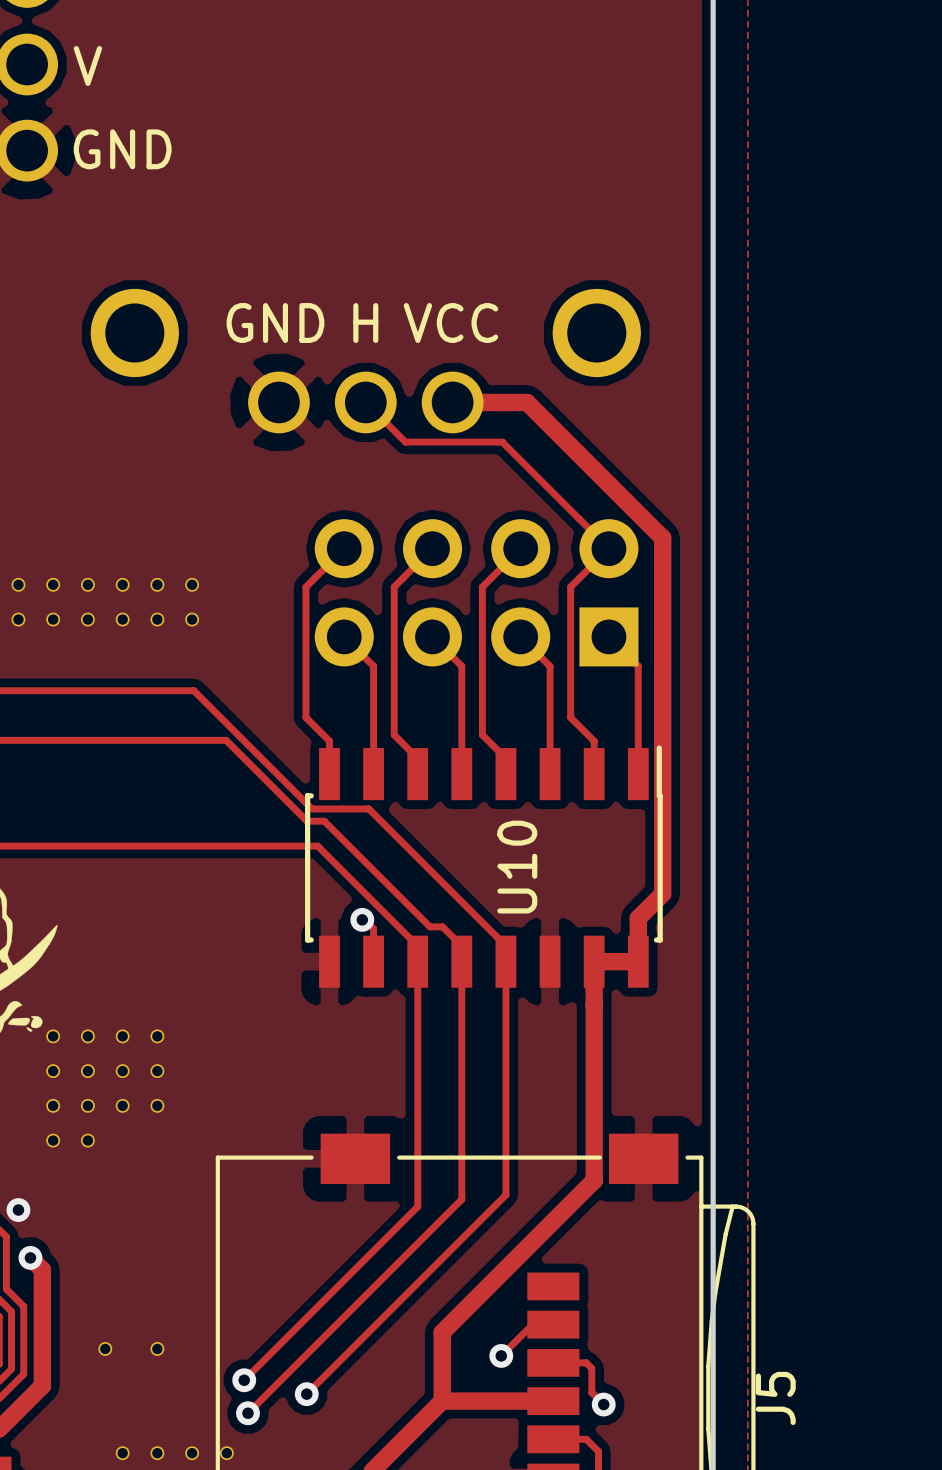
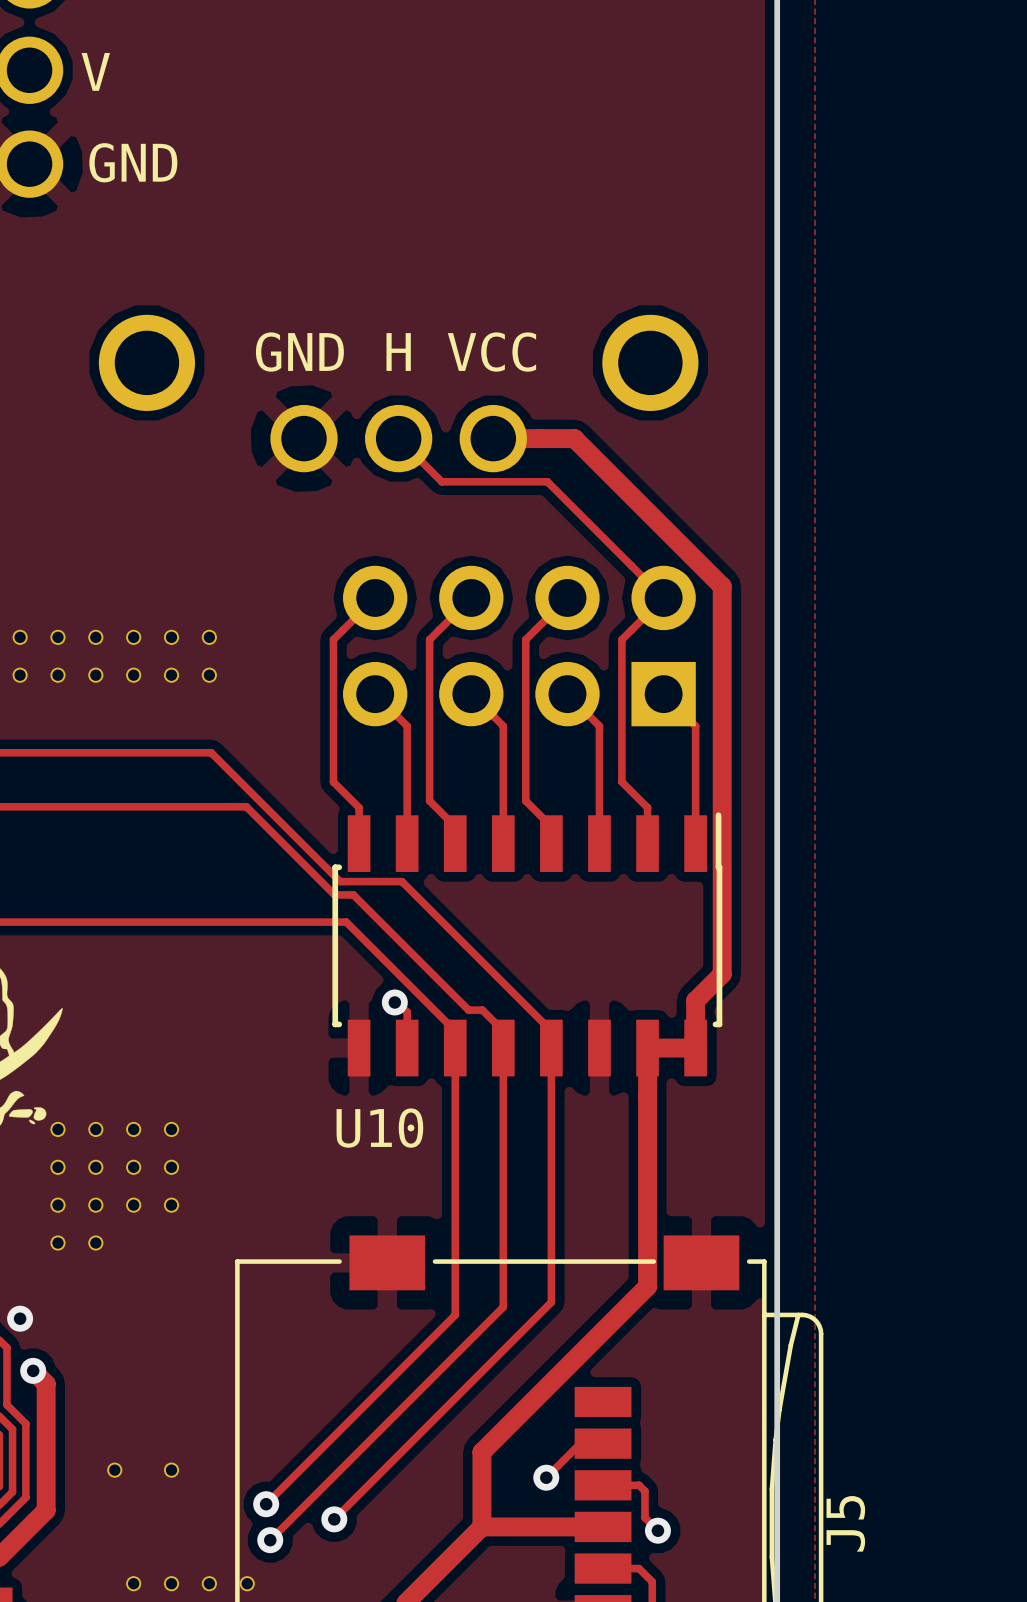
U10 name rotation: 0° (517, 867) -> 90° clockwise (379, 1128)
U10 name position: U10 (517, 867) -> U10 (379, 1128)

